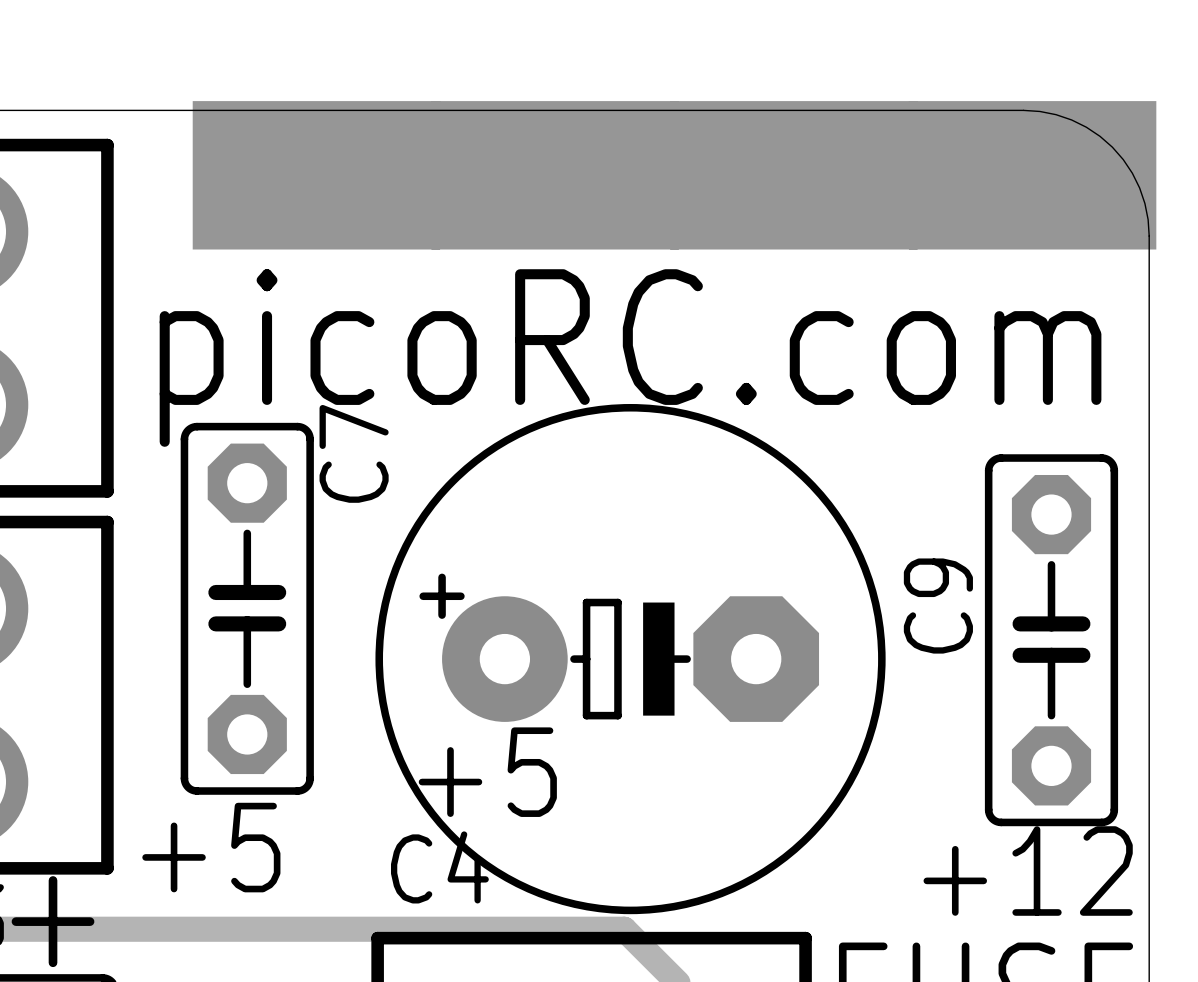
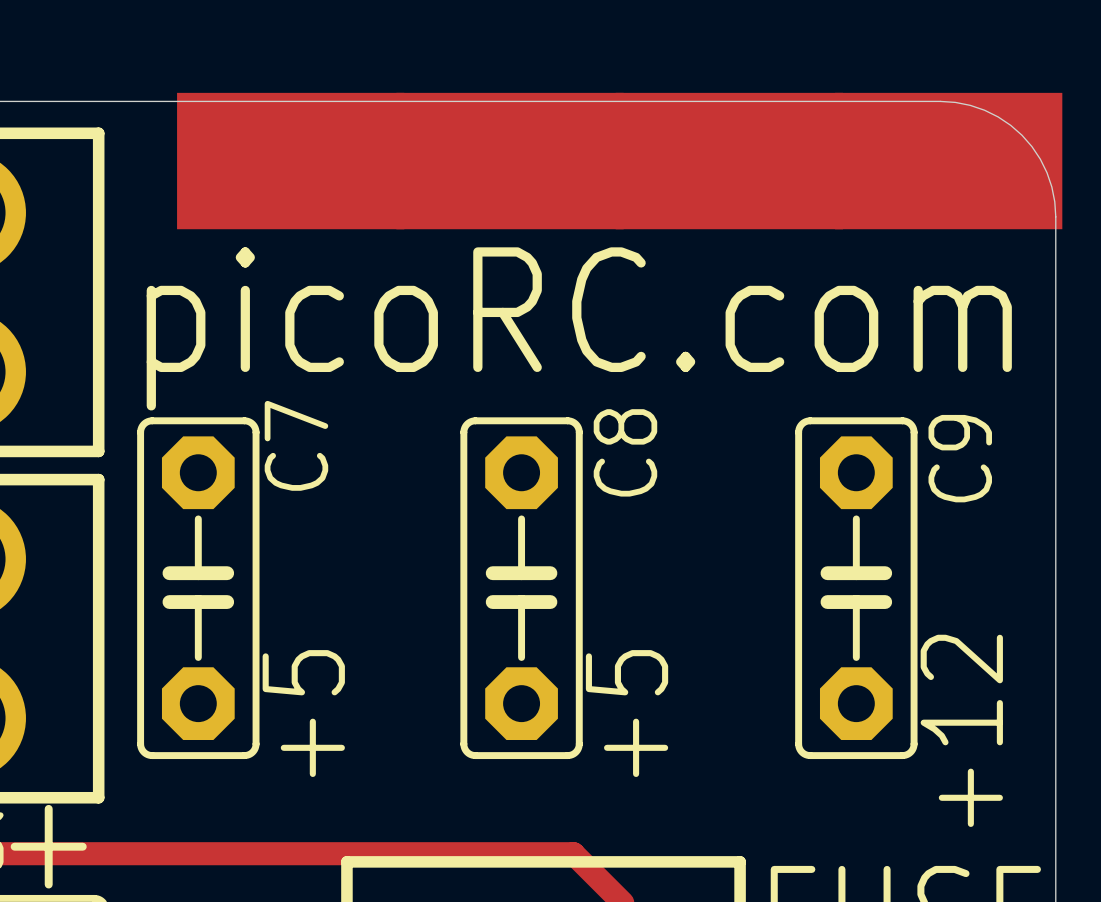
C9 name position: C9 (938, 606) -> C9 (960, 458)
C7 position: (247, 608) -> (198, 588)
C8: none -> (521, 588)
C9 position: (1051, 640) -> (856, 588)
C4: (630, 659) -> none
text: +5 (487, 772) -> none
text: none -> +5 (303, 713)
text: none -> +5 (627, 713)
text: +5 (211, 847) -> none
text rotation: 0° (1028, 871) -> 90° counterclockwise (961, 730)

